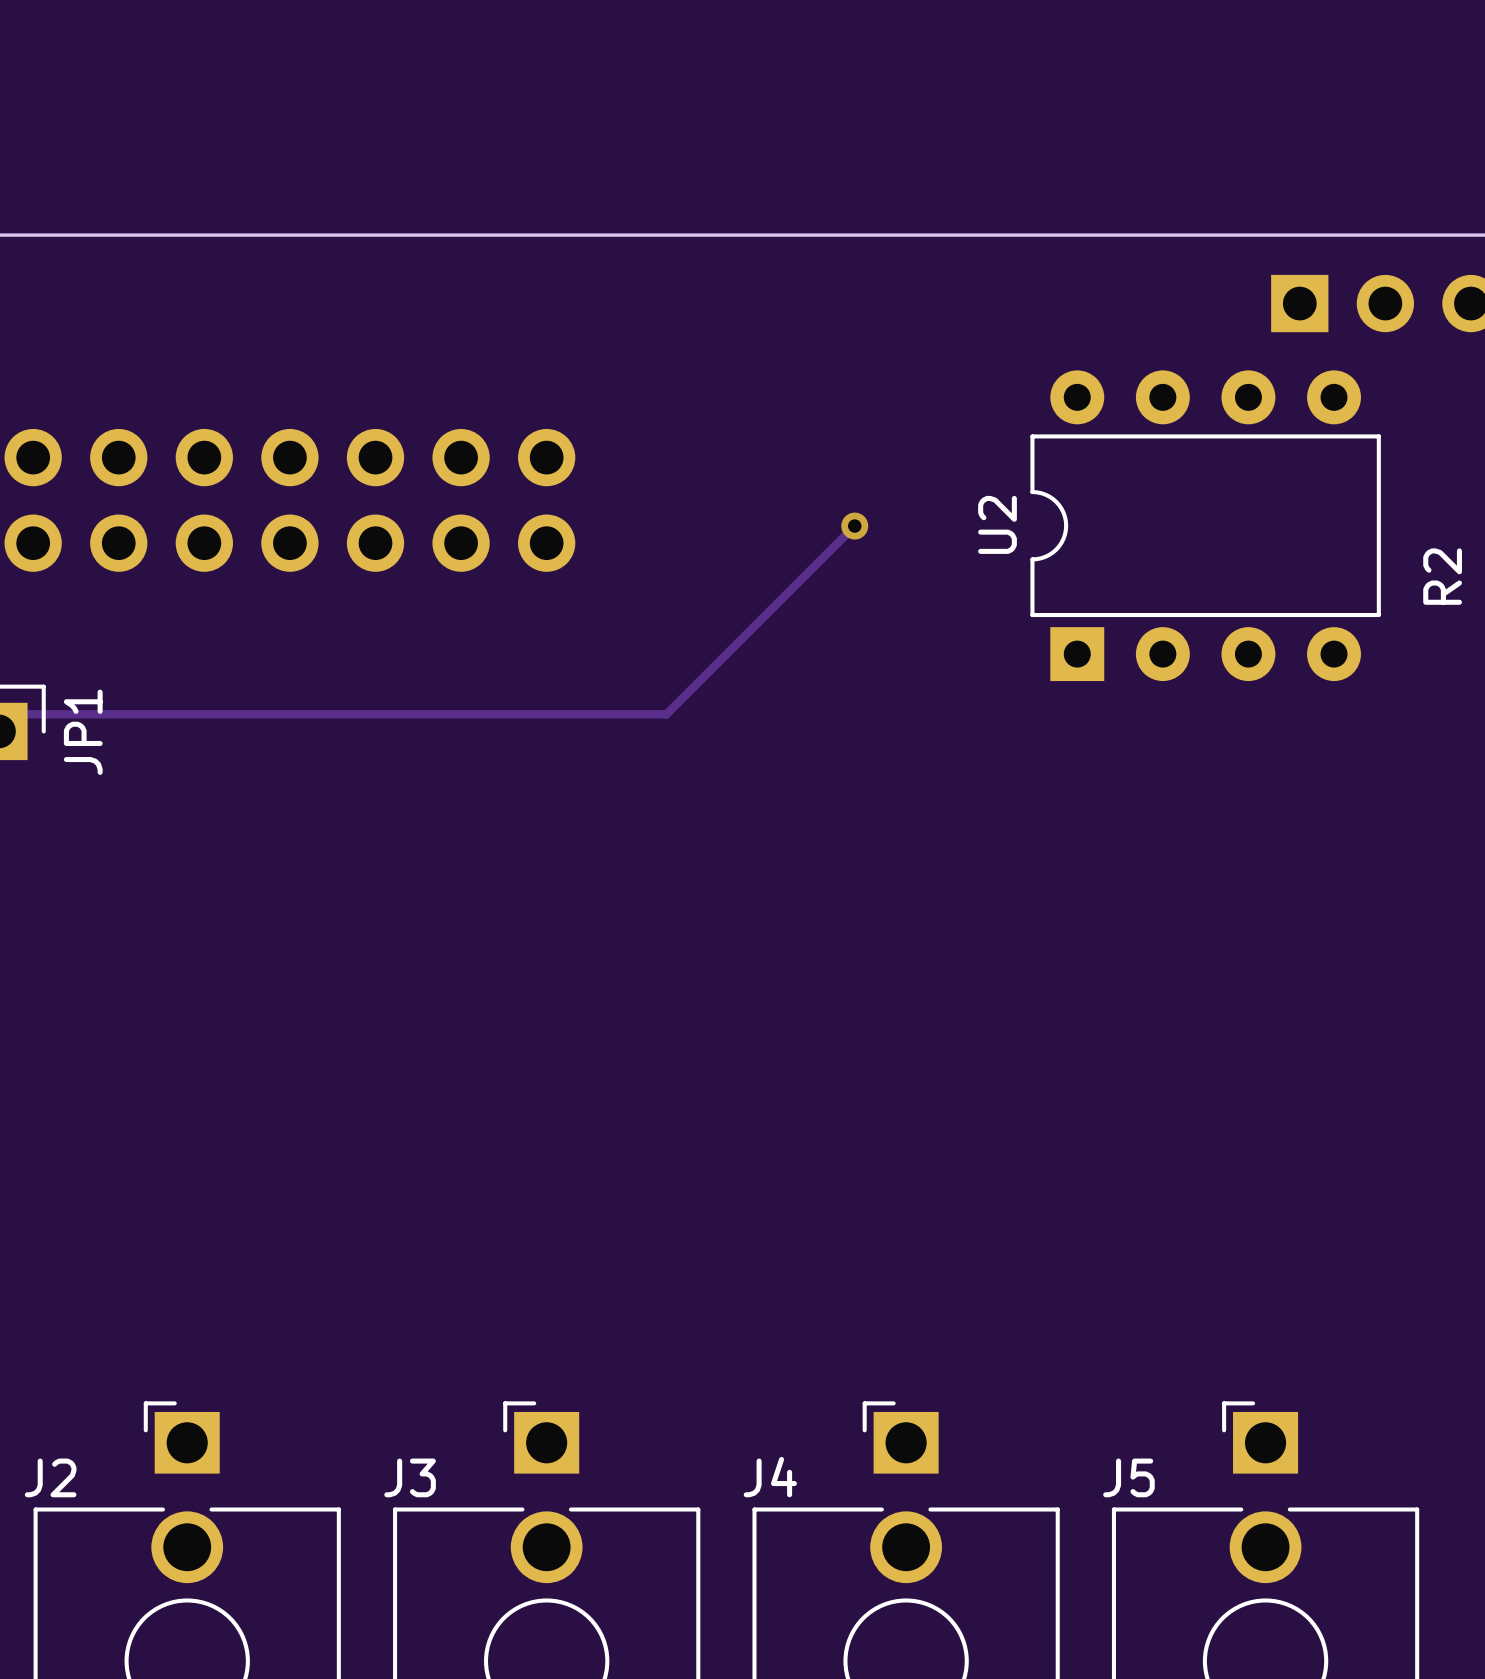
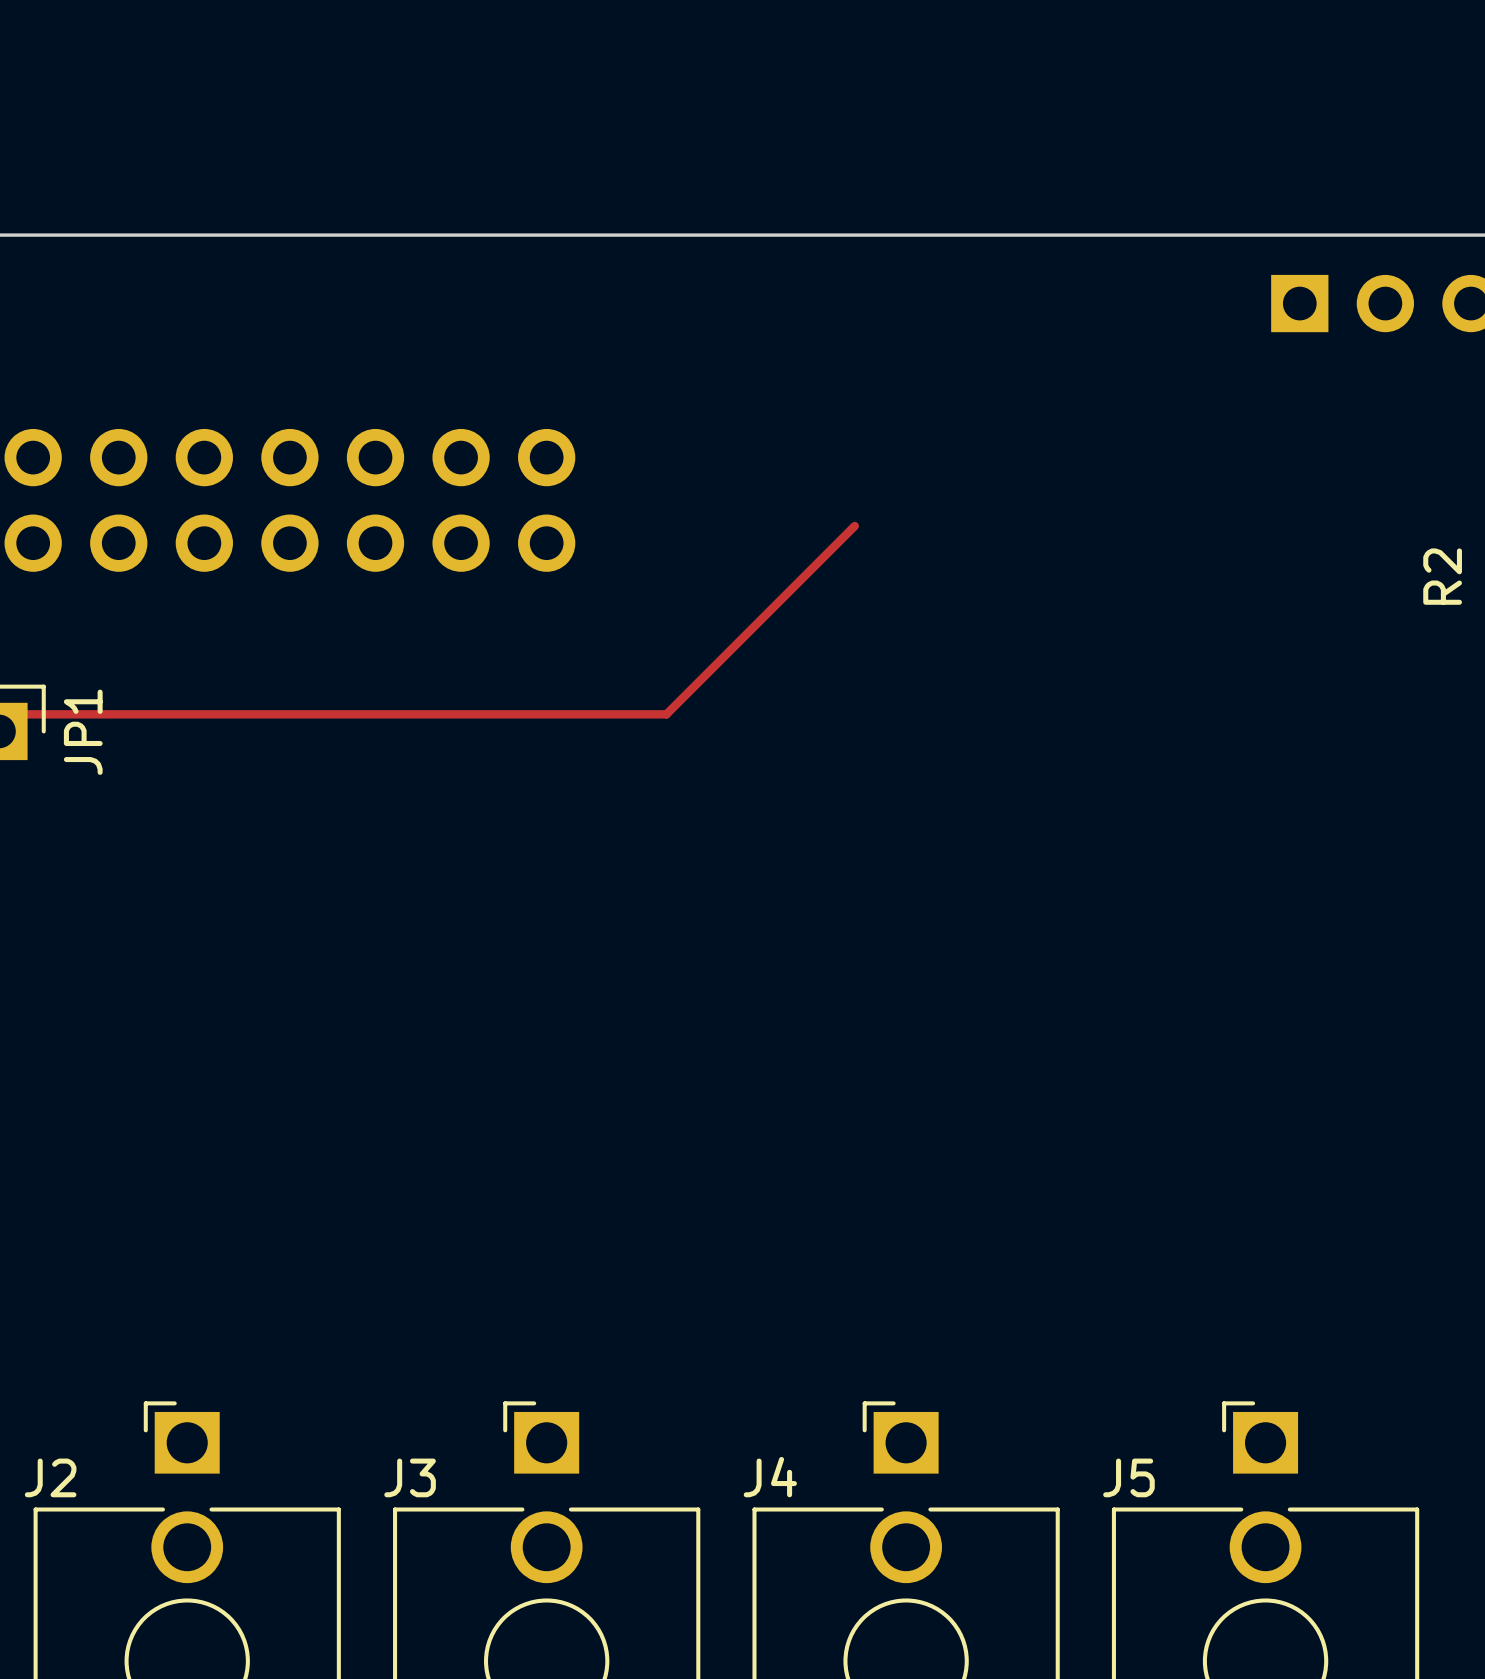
U2: (1205, 525) -> none
via: (854, 526) -> none

